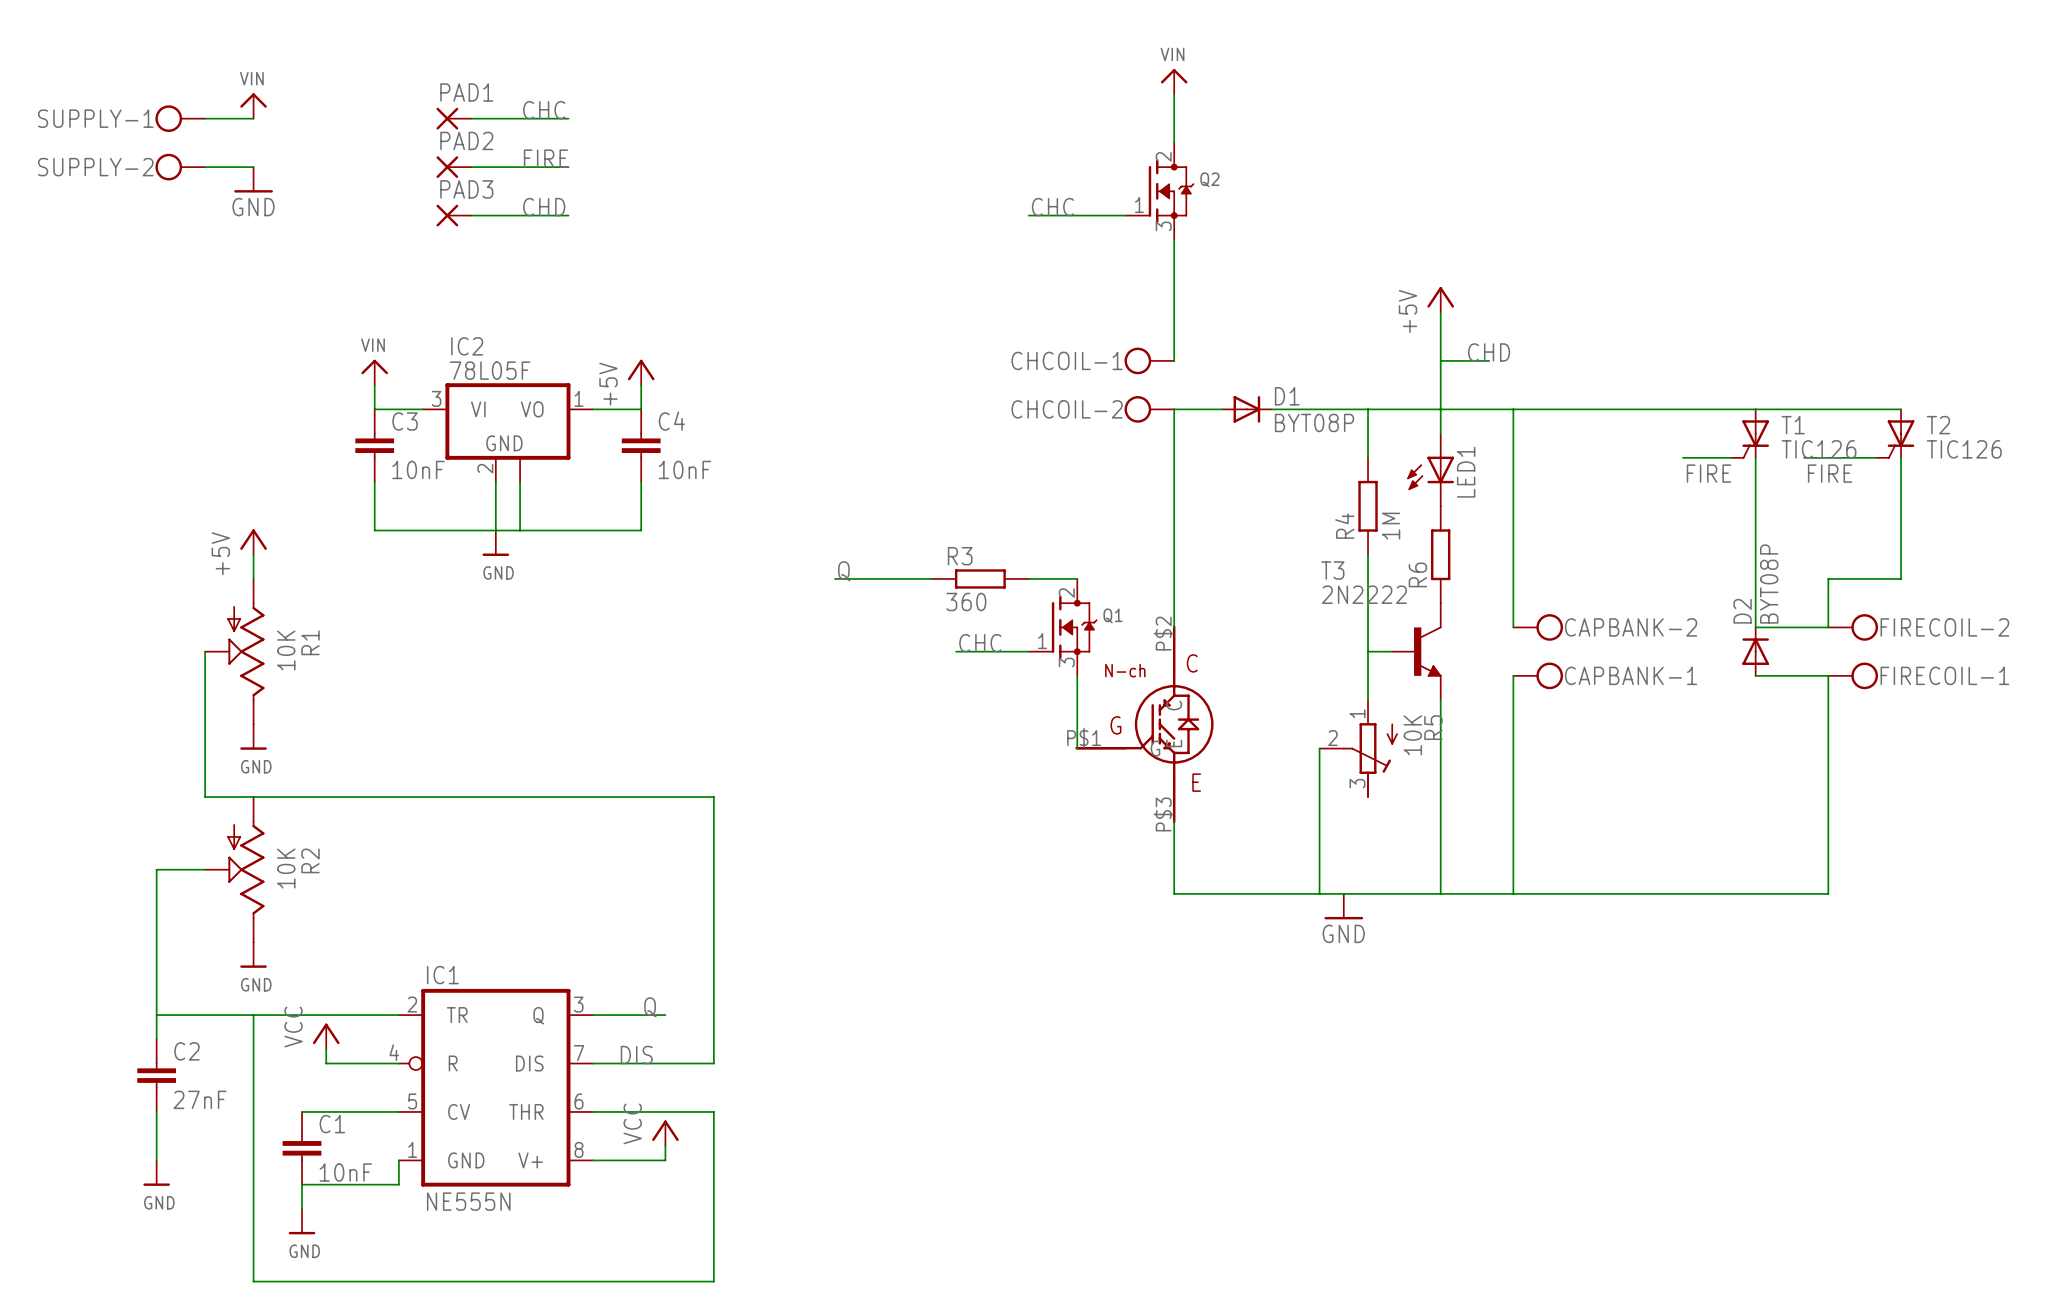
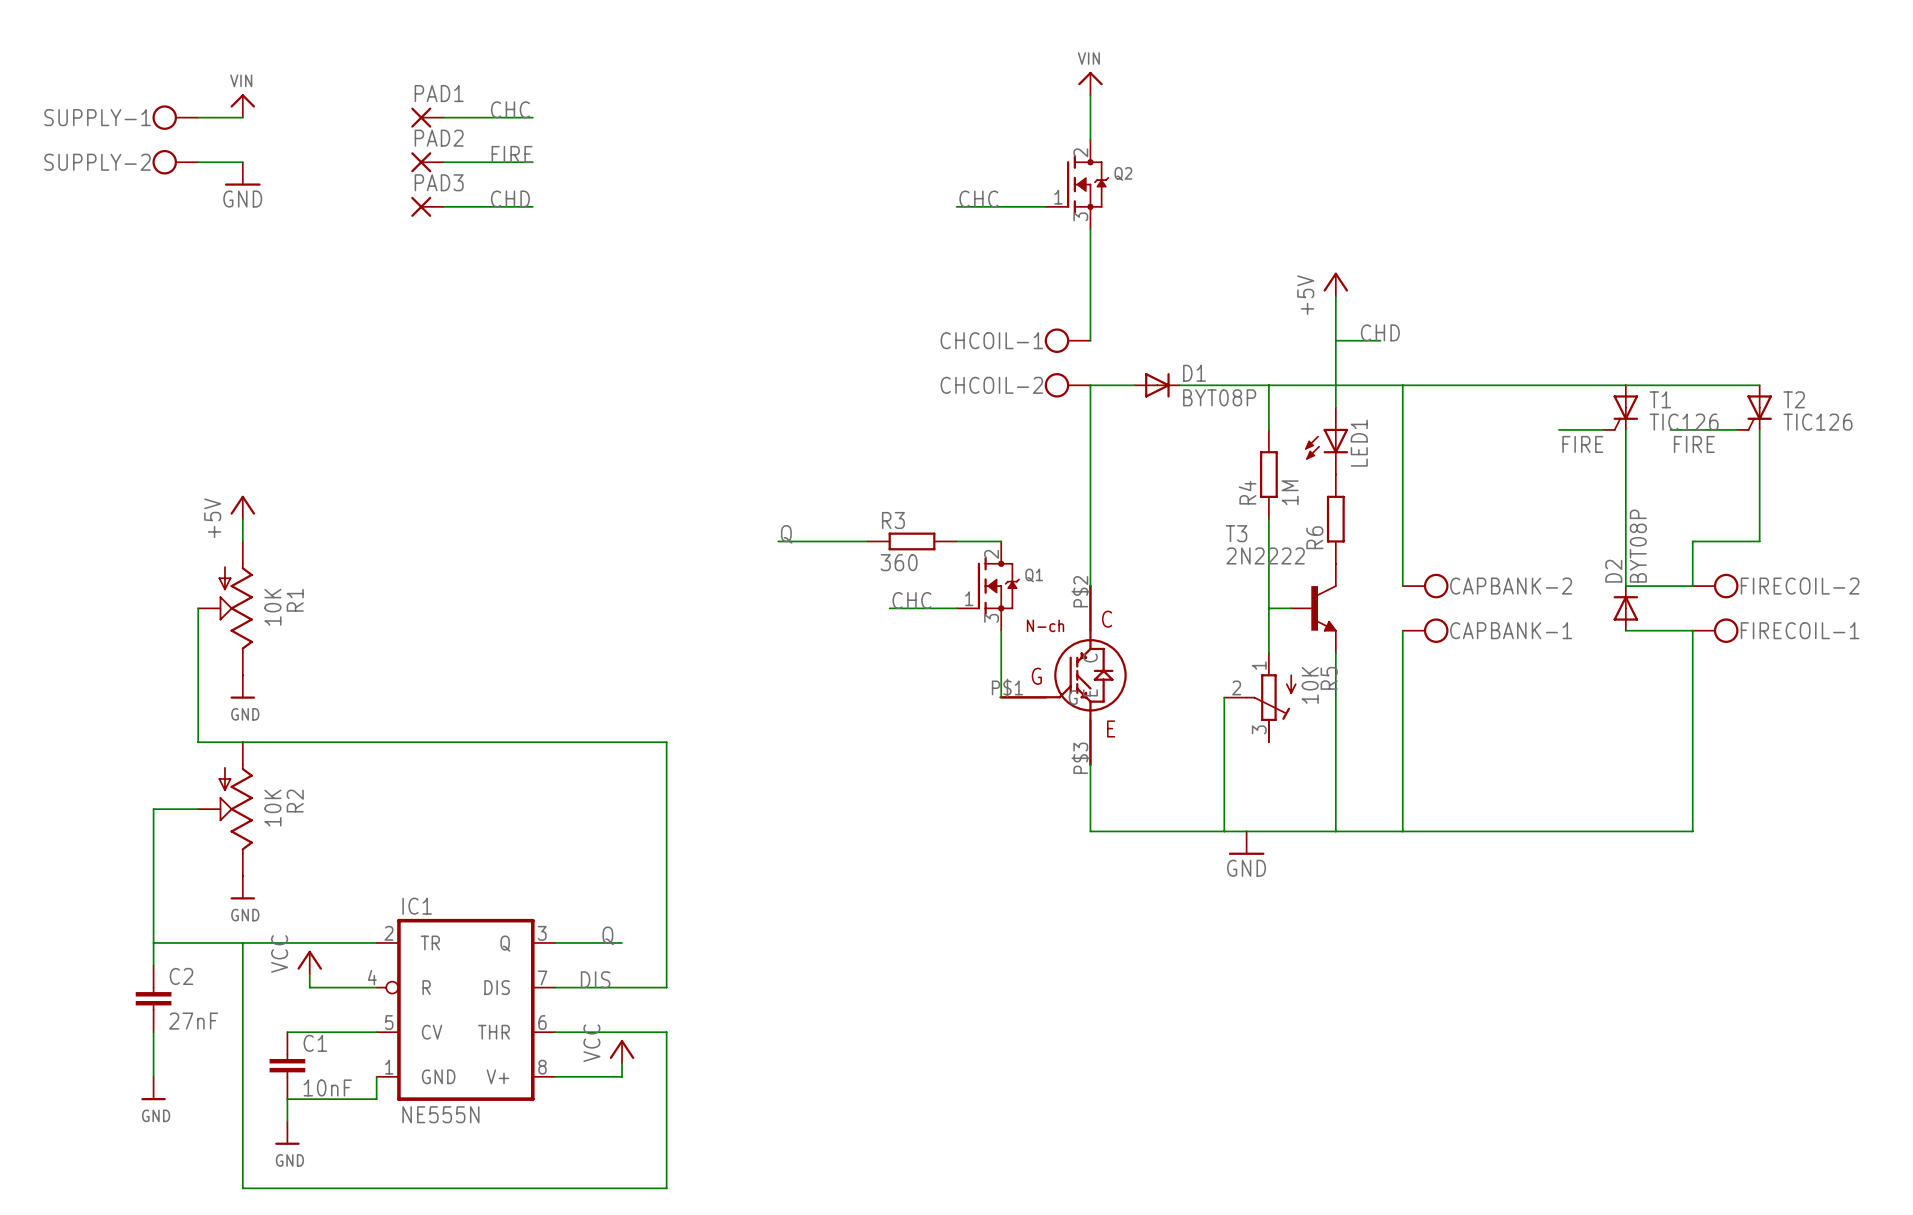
power symbol: VIN (374, 372) -> none
power symbol: +5V (641, 372) -> none
wire: (374, 385) (374, 409) (423, 409) -> none
wire: (641, 385) (641, 409) (592, 409) -> none
IC2: 78L05F (507, 432) -> none
C3: 10nF (374, 445) -> none
C4: 10nF (641, 445) -> none
wire: (374, 482) (374, 530) (641, 530) (641, 482) -> none
wire: (495, 482) (495, 530) -> none
wire: (520, 482) (520, 530) -> none
power symbol: GND (495, 543) -> none

